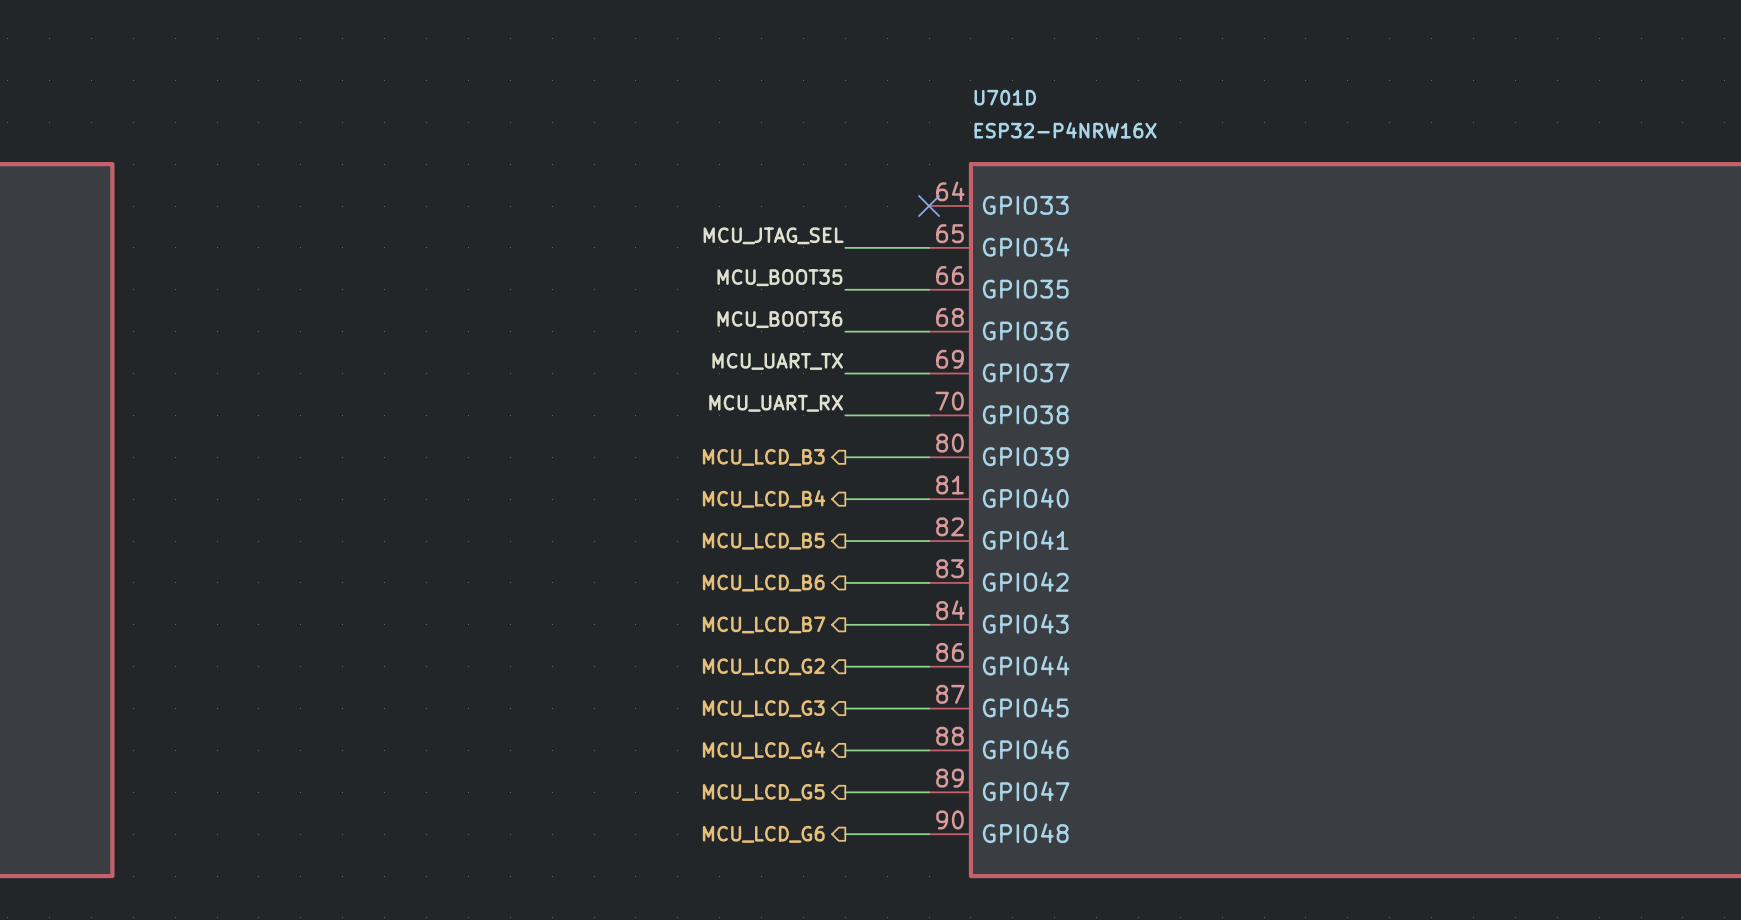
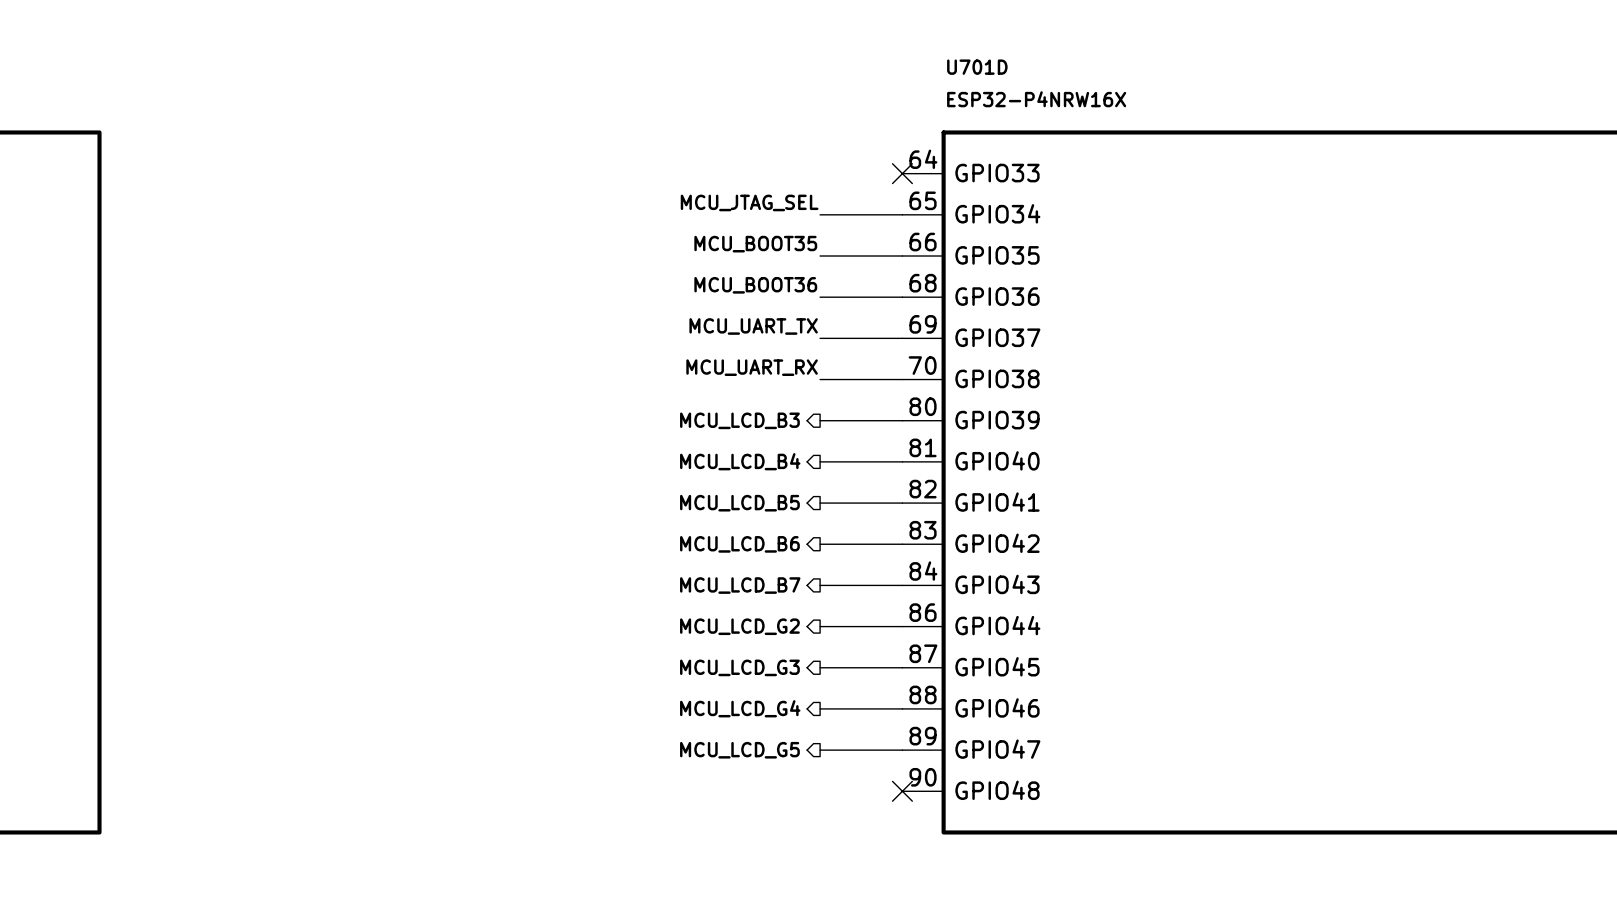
hierarchical label: MCU_LCD_G6 (763, 834) -> none
wire: (845, 834) (929, 834) -> none
no-connect mark: none -> (902, 791)

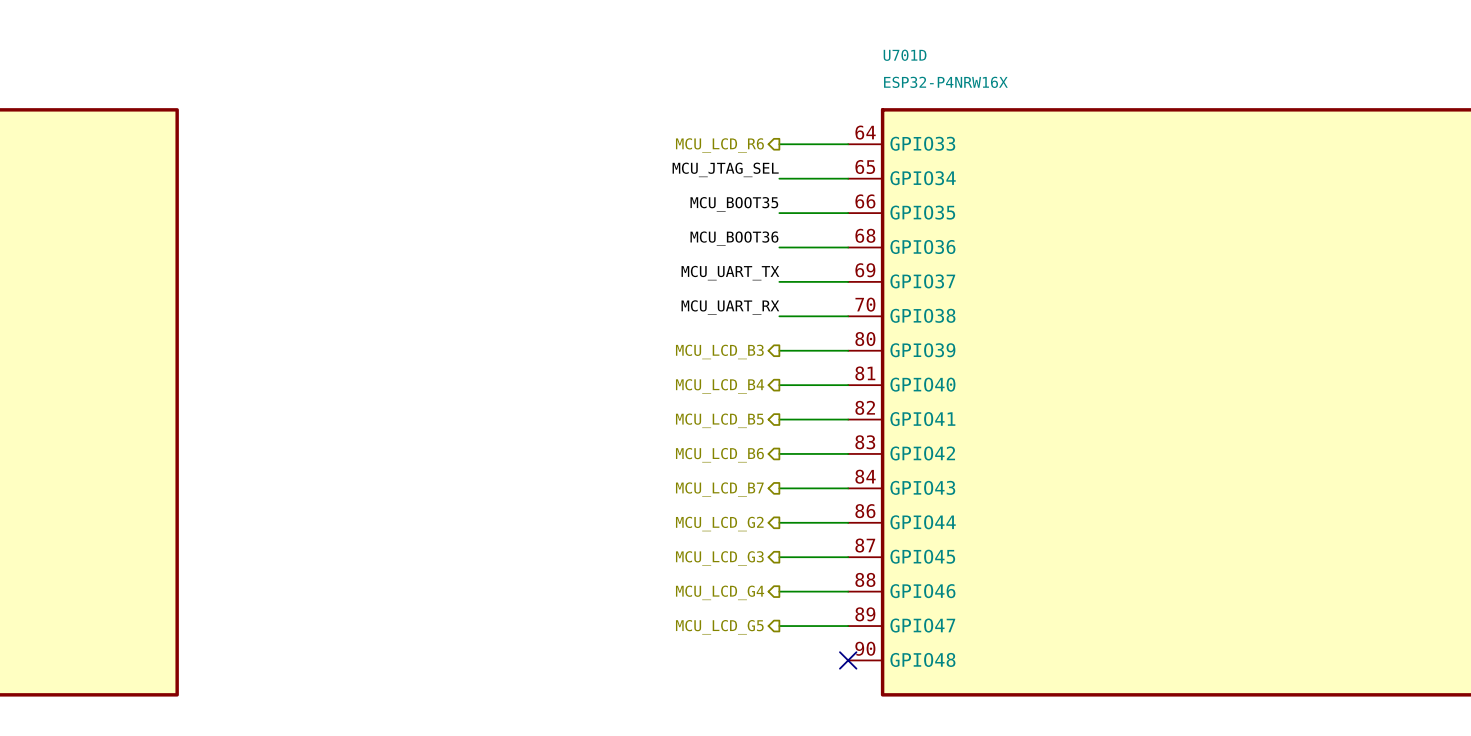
hierarchical label: none -> MCU_LCD_R6 (719, 145)
wire: none -> (779, 144) (848, 144)
no-connect mark: (902, 173) -> none

